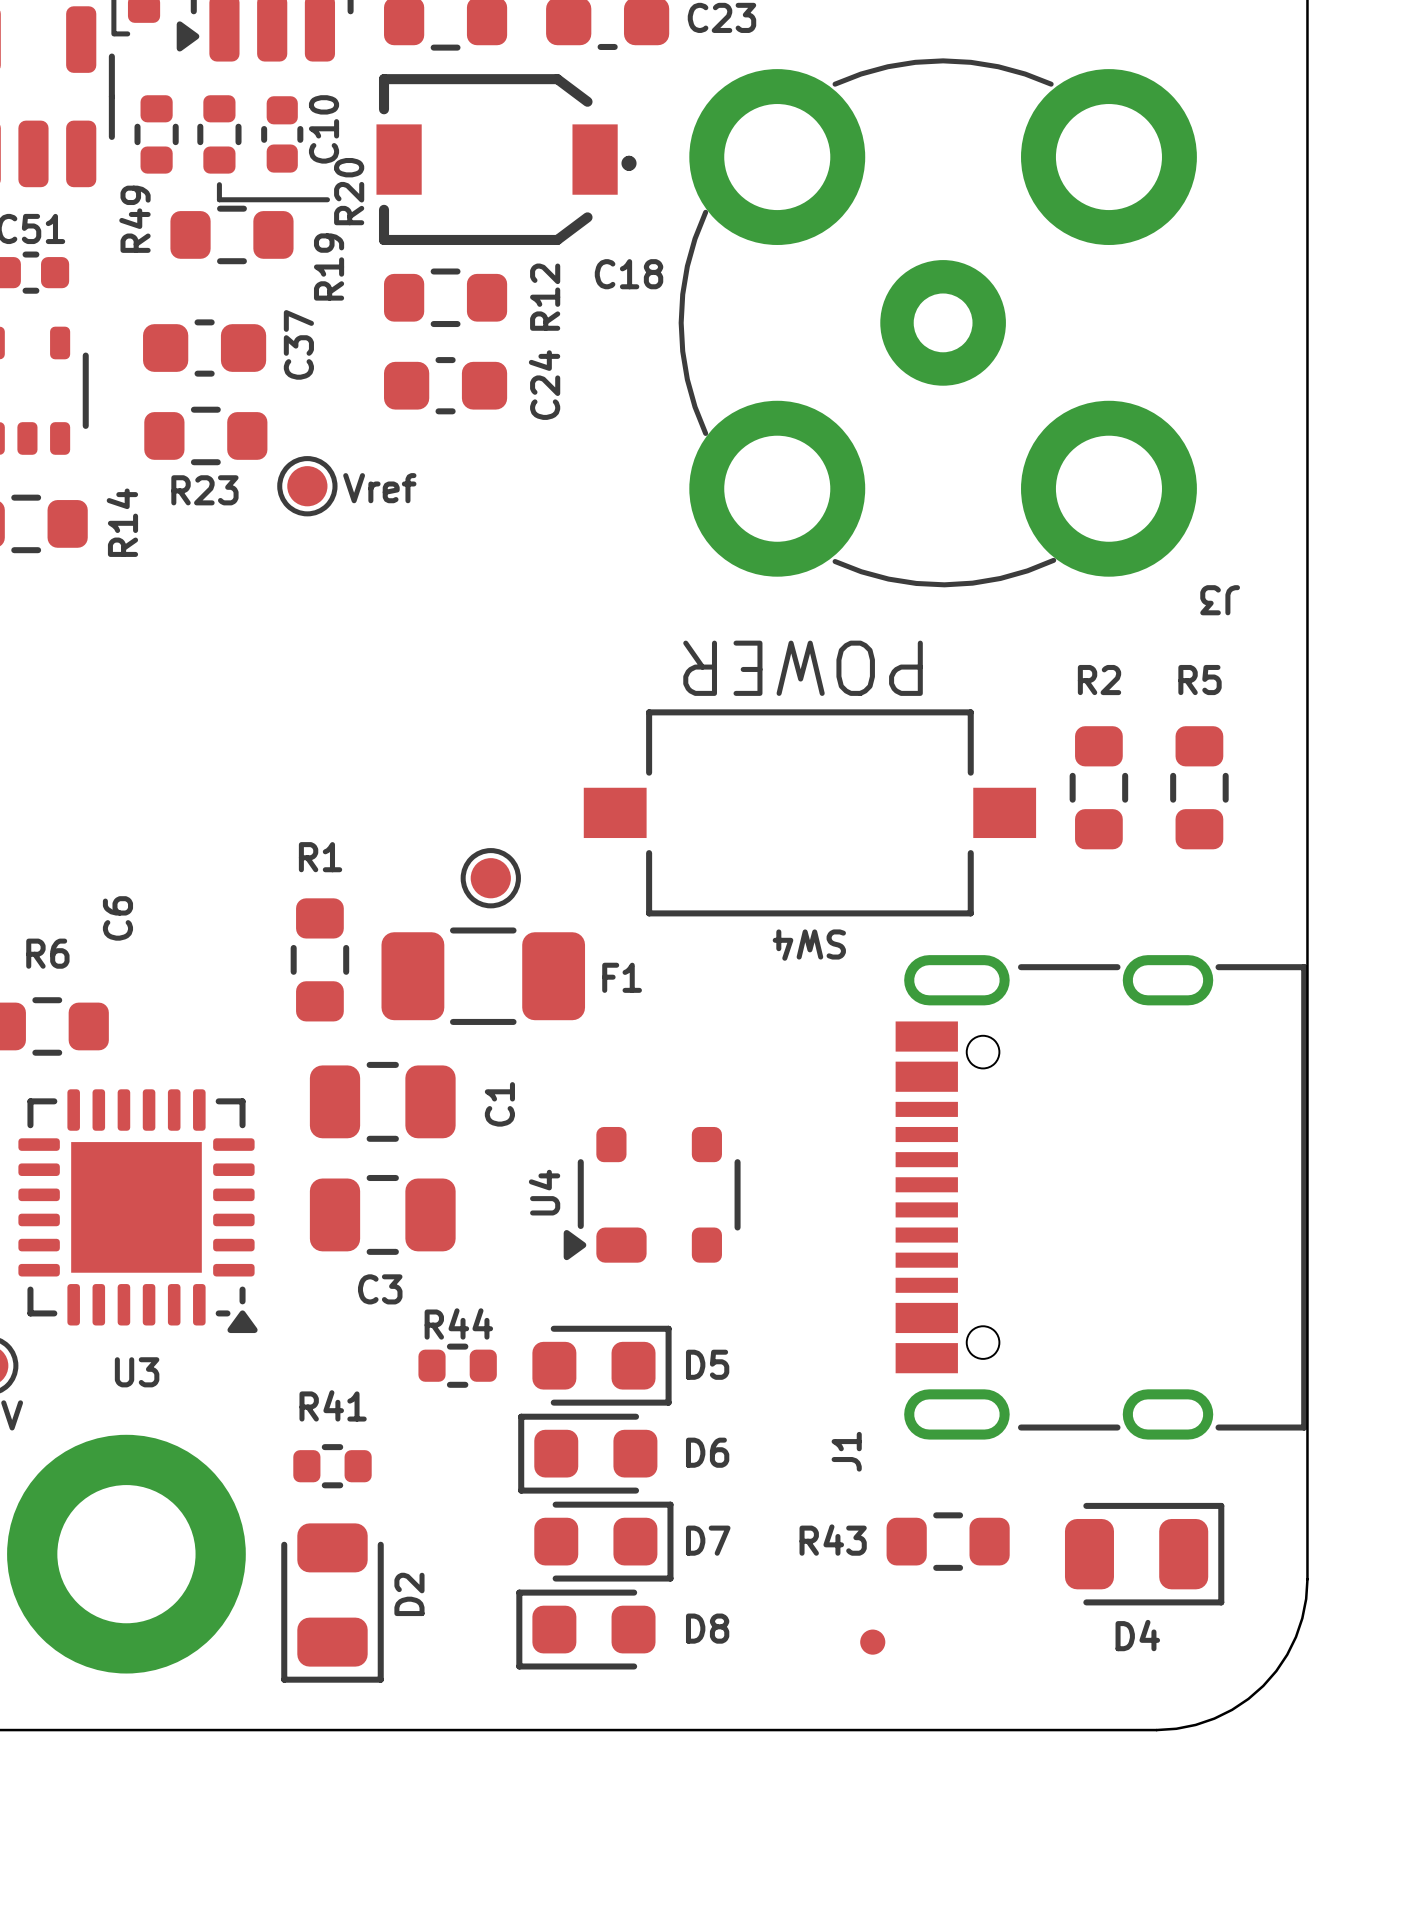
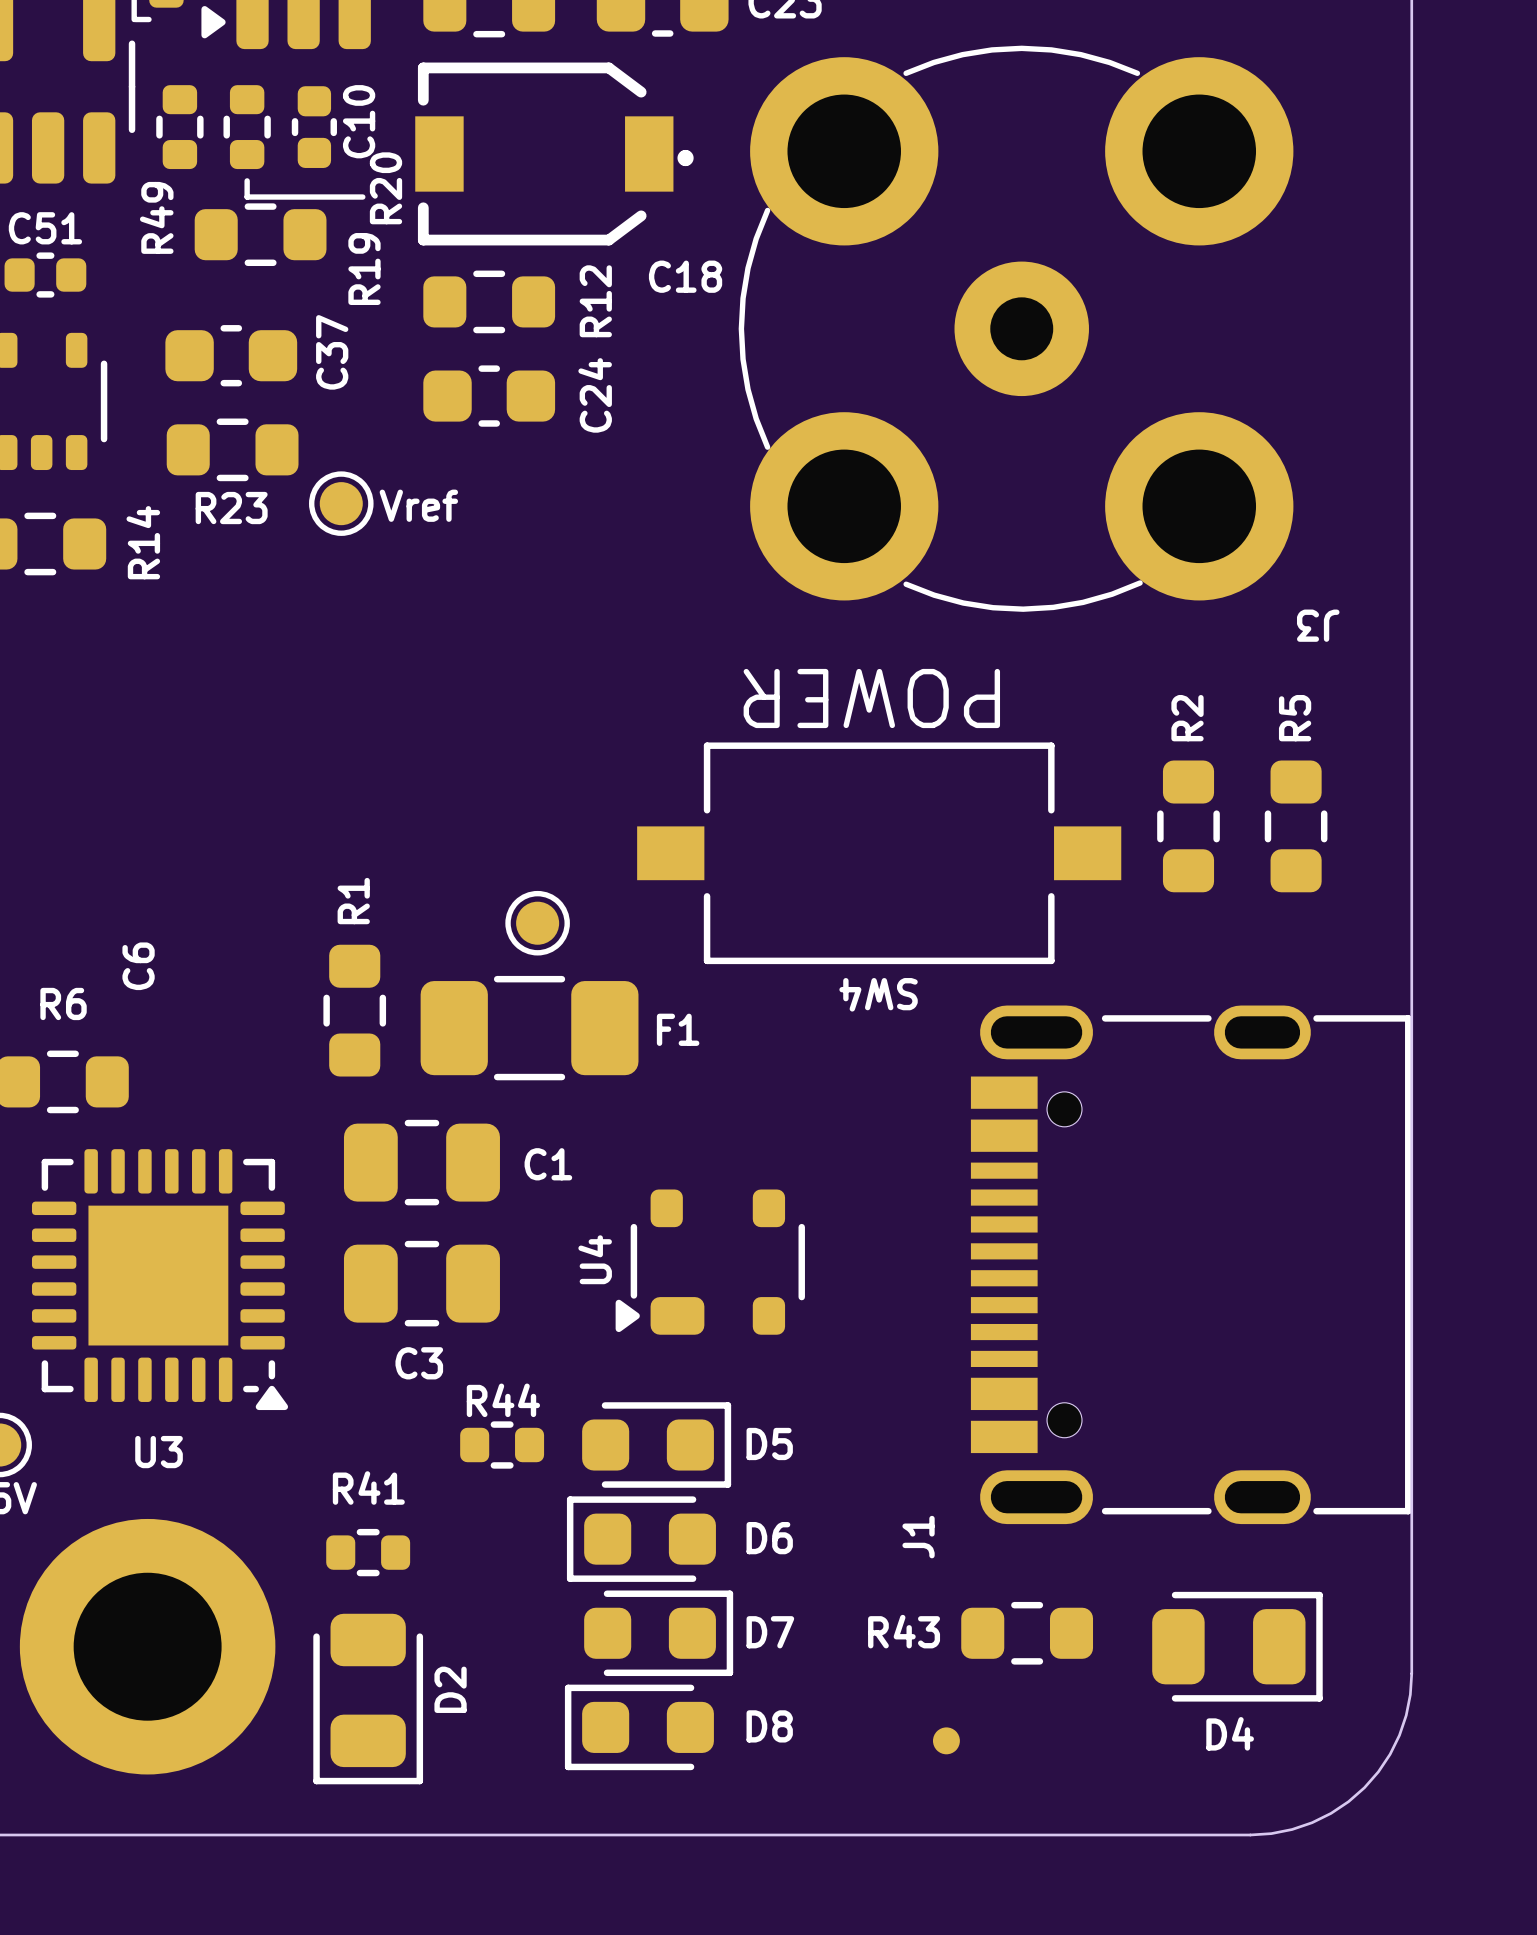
R2 name rotation: 0° (1099, 680) -> 90° counterclockwise (1187, 718)
R5 name rotation: 0° (1200, 680) -> 90° counterclockwise (1295, 718)
R1 name rotation: 0° (320, 857) -> 90° counterclockwise (353, 901)
C1 name rotation: 0° (499, 1104) -> 90° clockwise (548, 1164)

